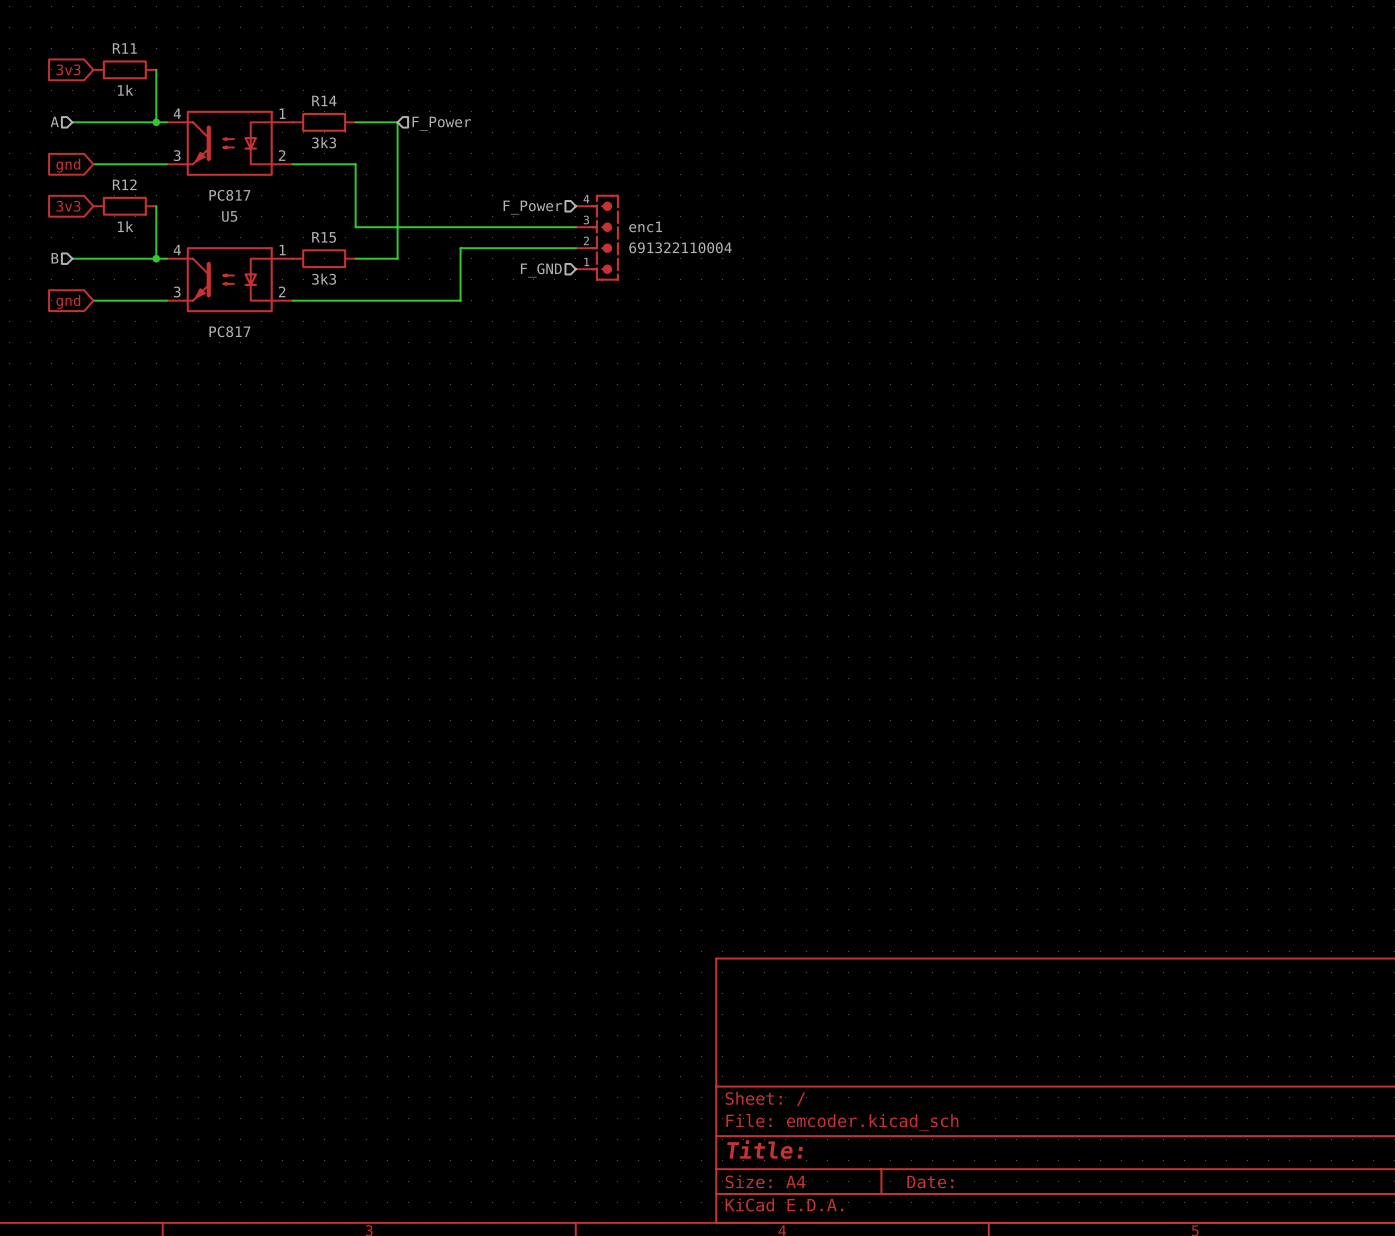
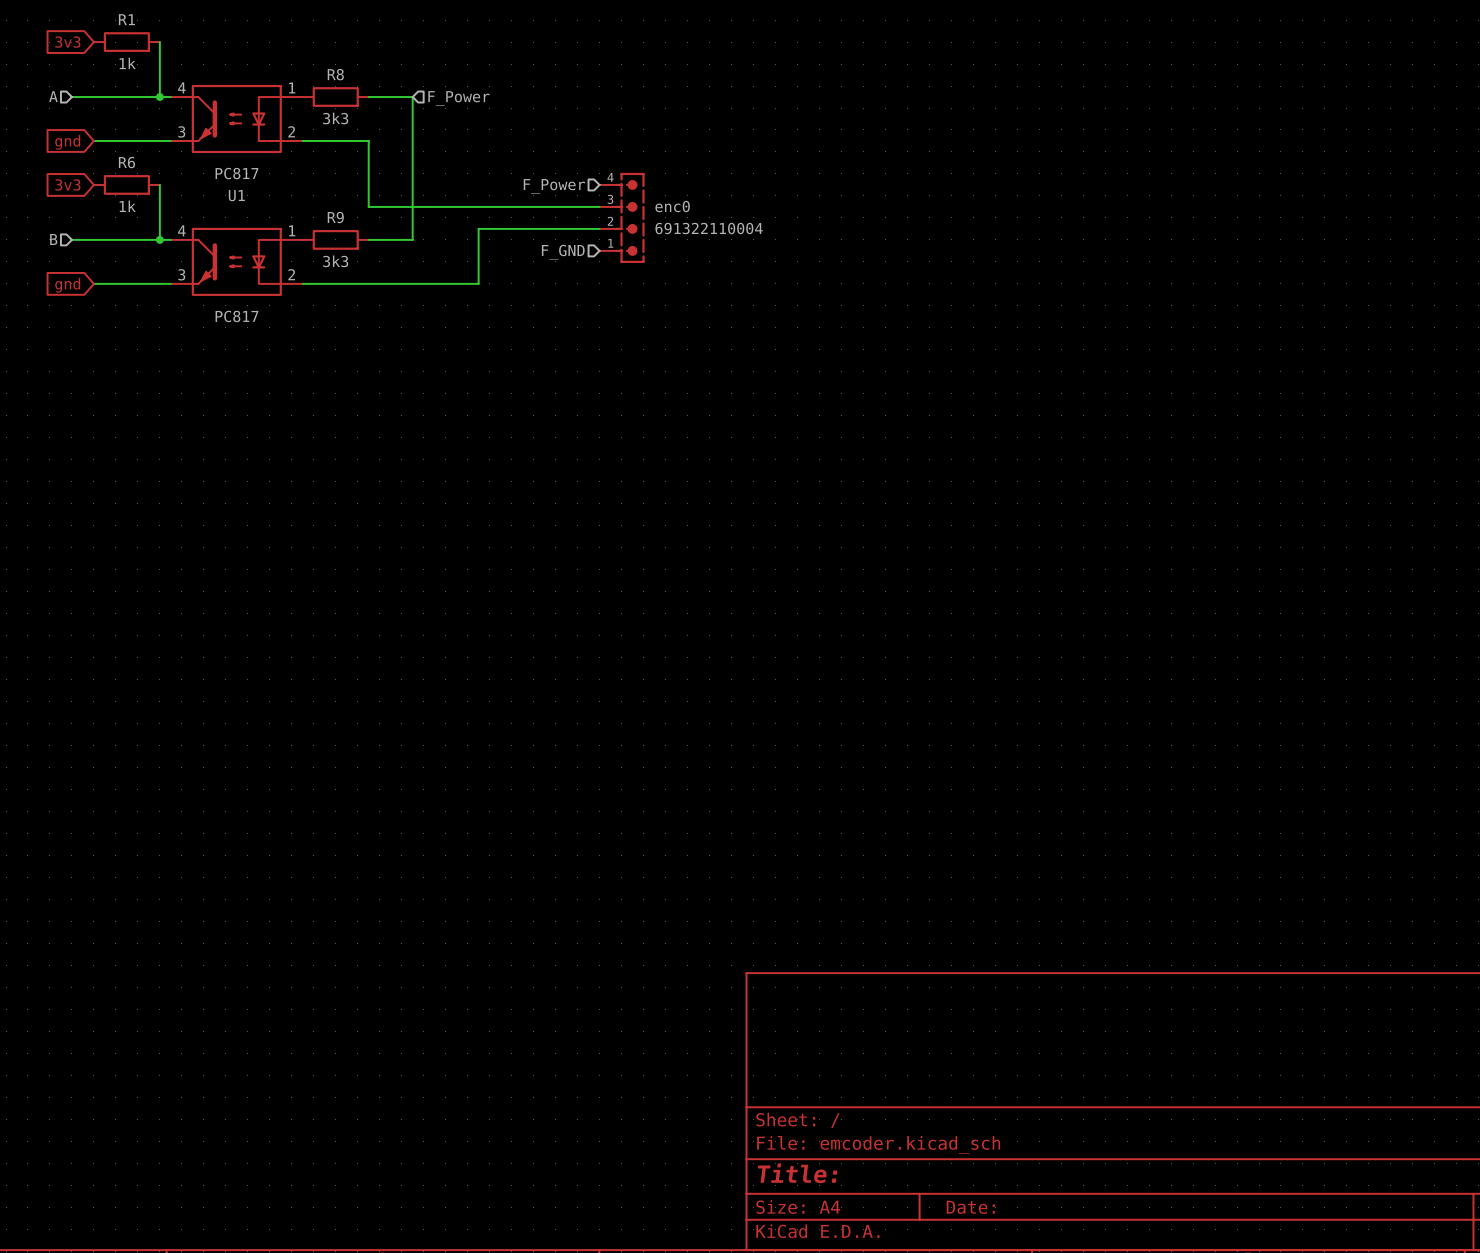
R11 name: R11 (124, 48) -> R1 (126, 19)
R14 name: R14 (324, 100) -> R8 (335, 74)
R12 name: R12 (124, 184) -> R6 (126, 162)
U5 name: U5 (229, 216) -> U1 (236, 195)
enc1 name: enc1 (645, 226) -> enc0 (672, 206)
R15 name: R15 (324, 237) -> R9 (335, 217)

